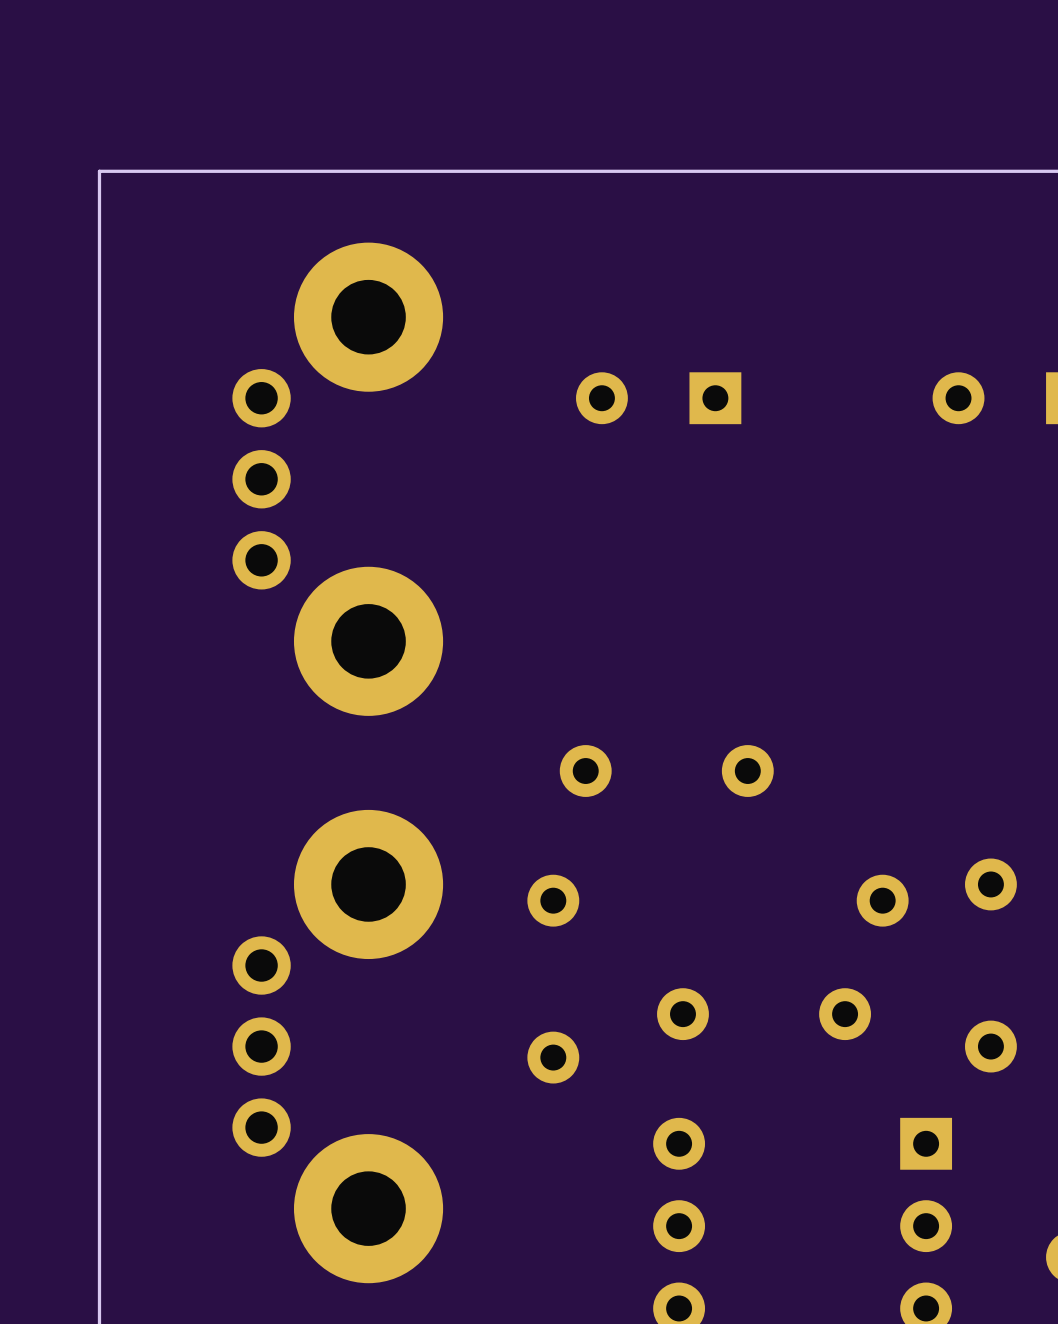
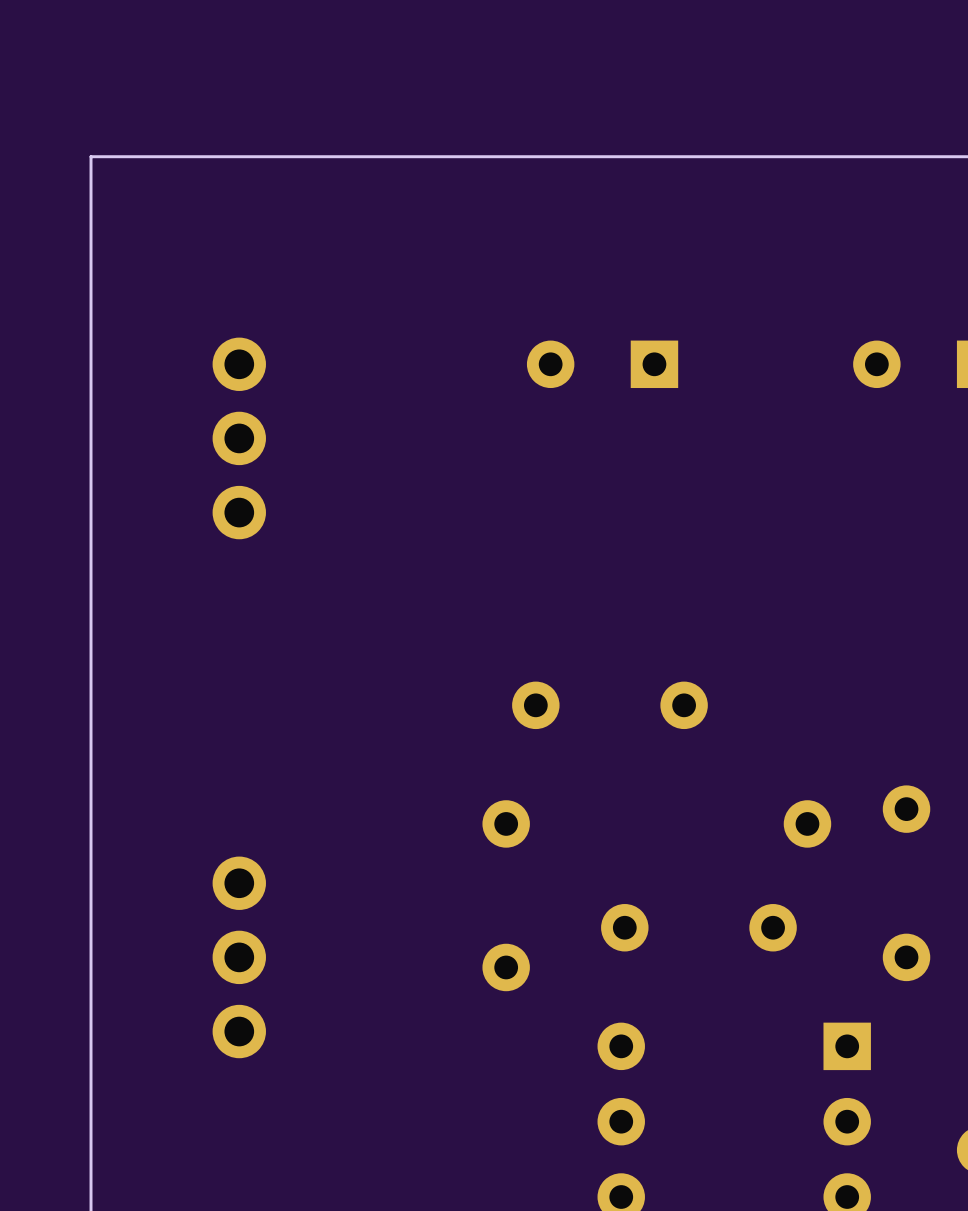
part: (337, 479) -> none
part: (337, 1046) -> none

